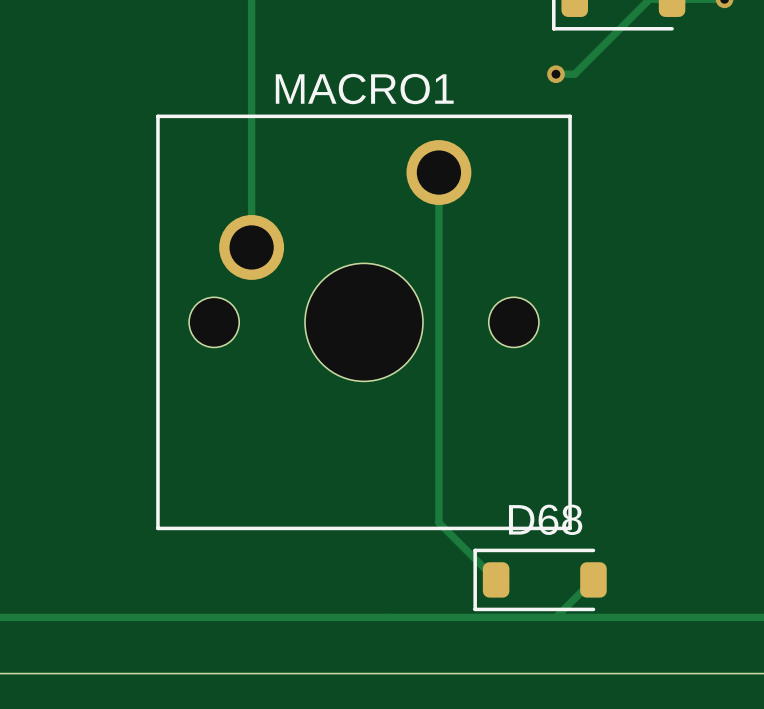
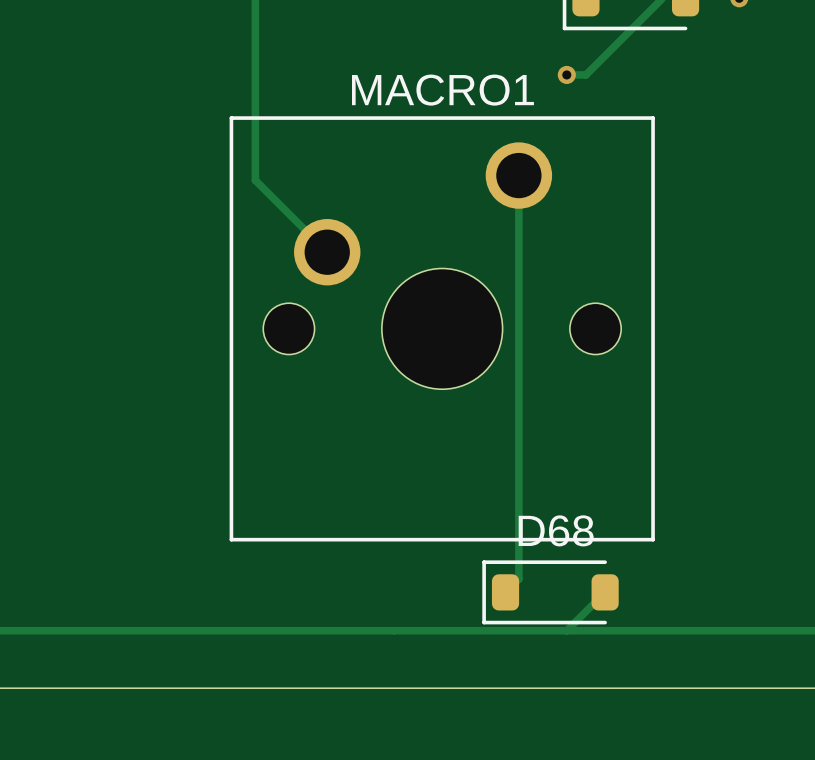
track: (438, 172) (438, 522) (496, 579) -> (518, 175) (518, 579) (505, 592)
track: (251, 177) (251, 247) -> (255, 180) (327, 252)
MACRO1 position: (364, 322) -> (442, 328)

